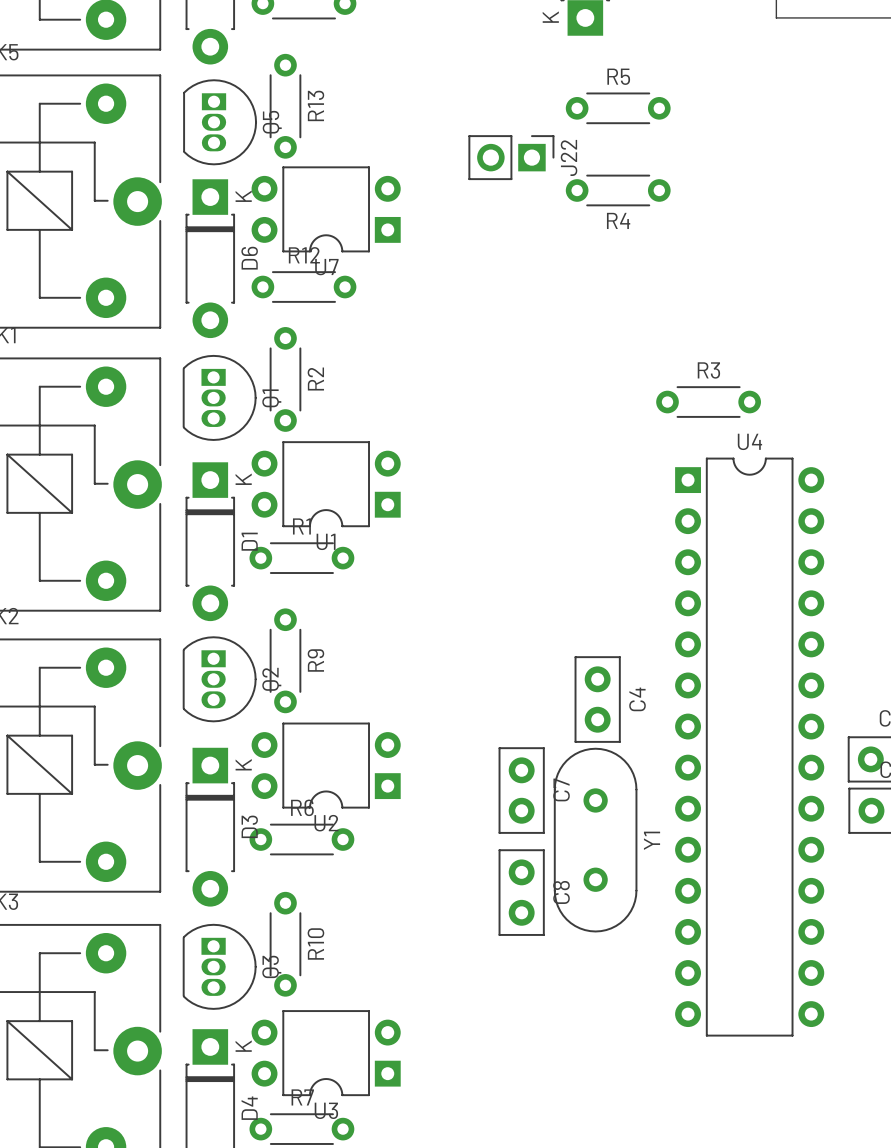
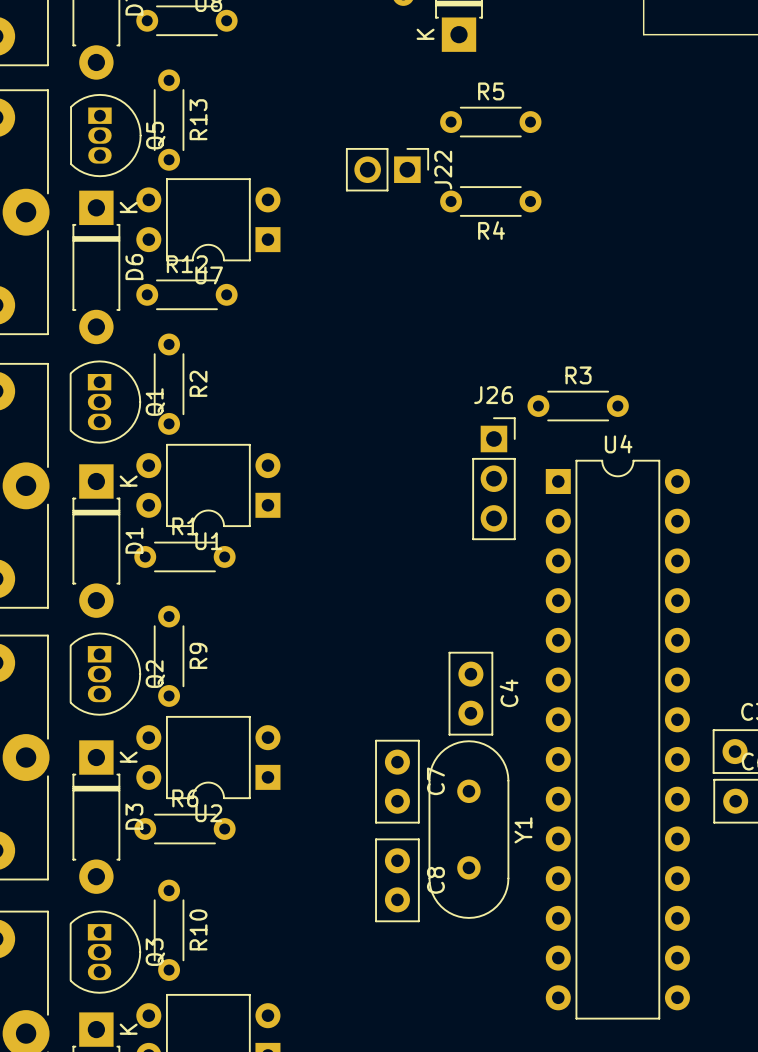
J26: none -> (493, 478)

